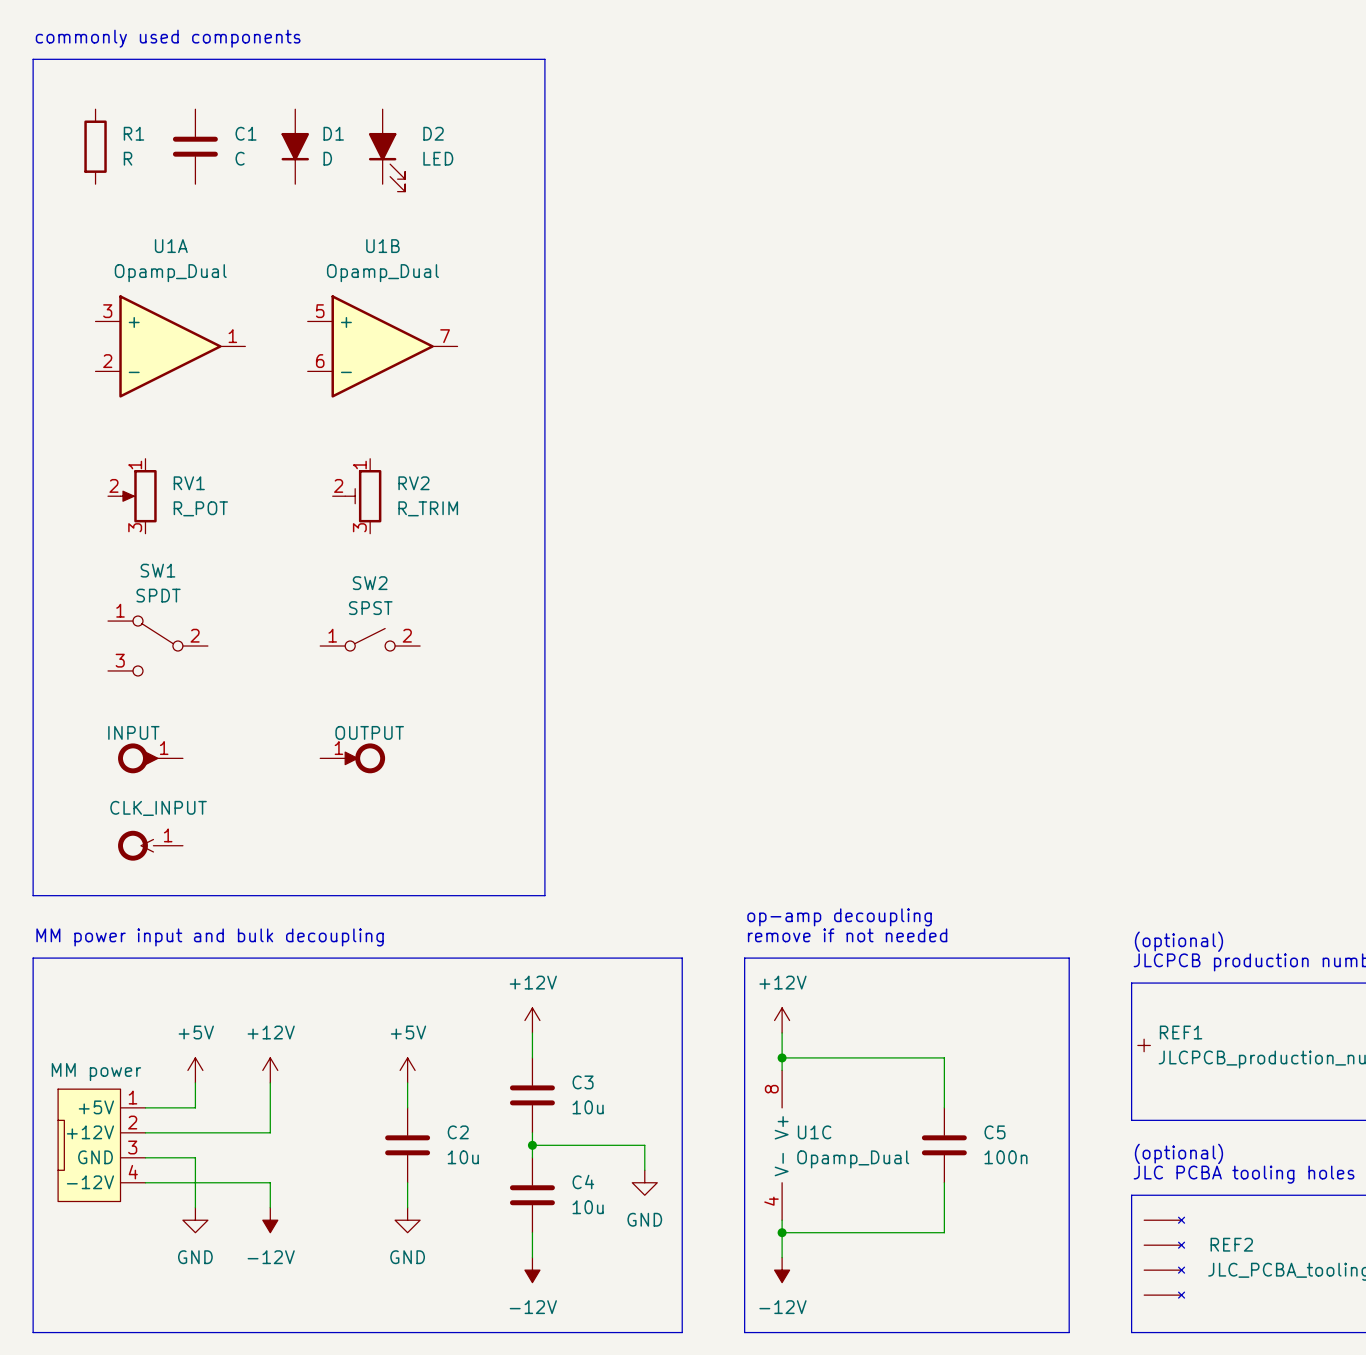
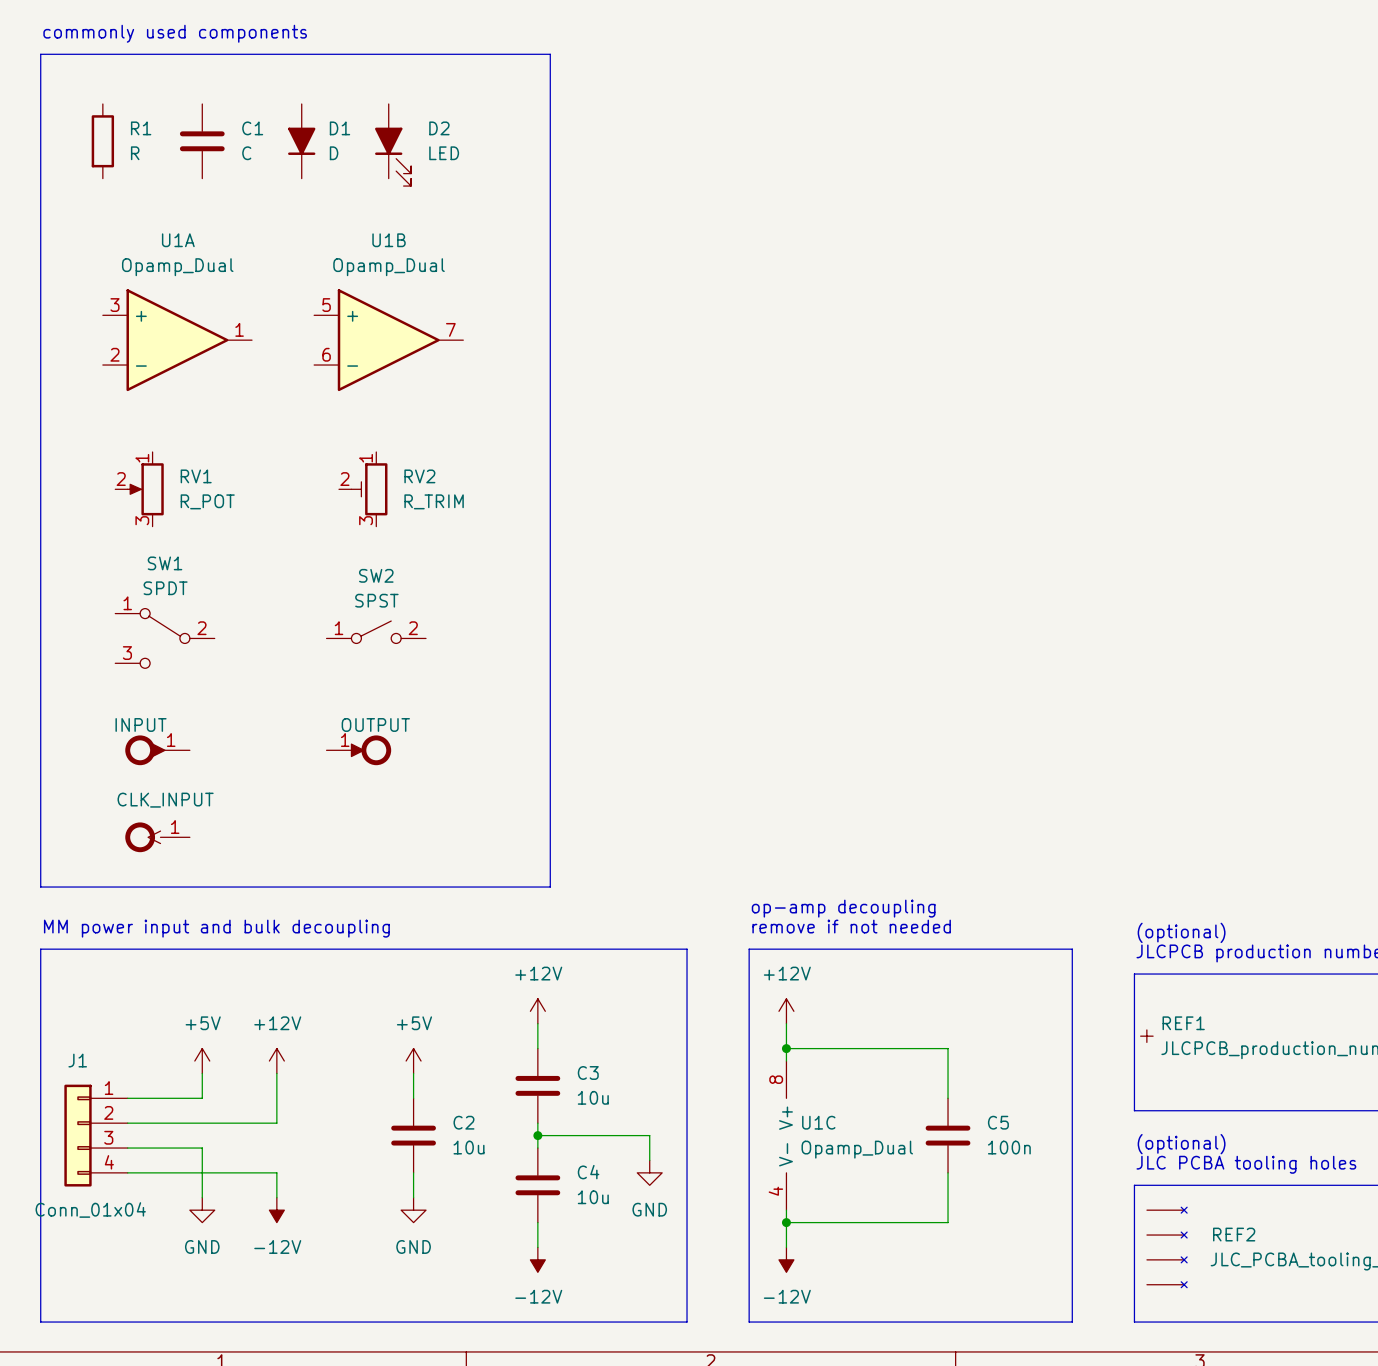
J1: none -> Conn_01x04 (96, 1135)
part: MM power (101, 1145) -> none

